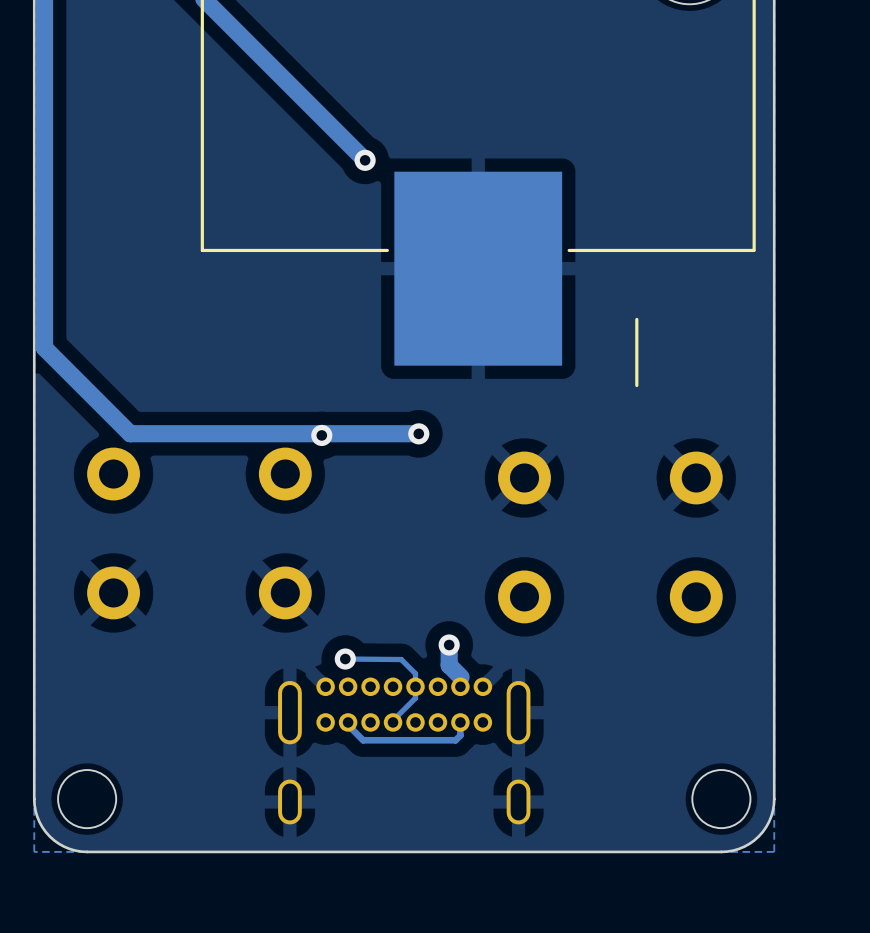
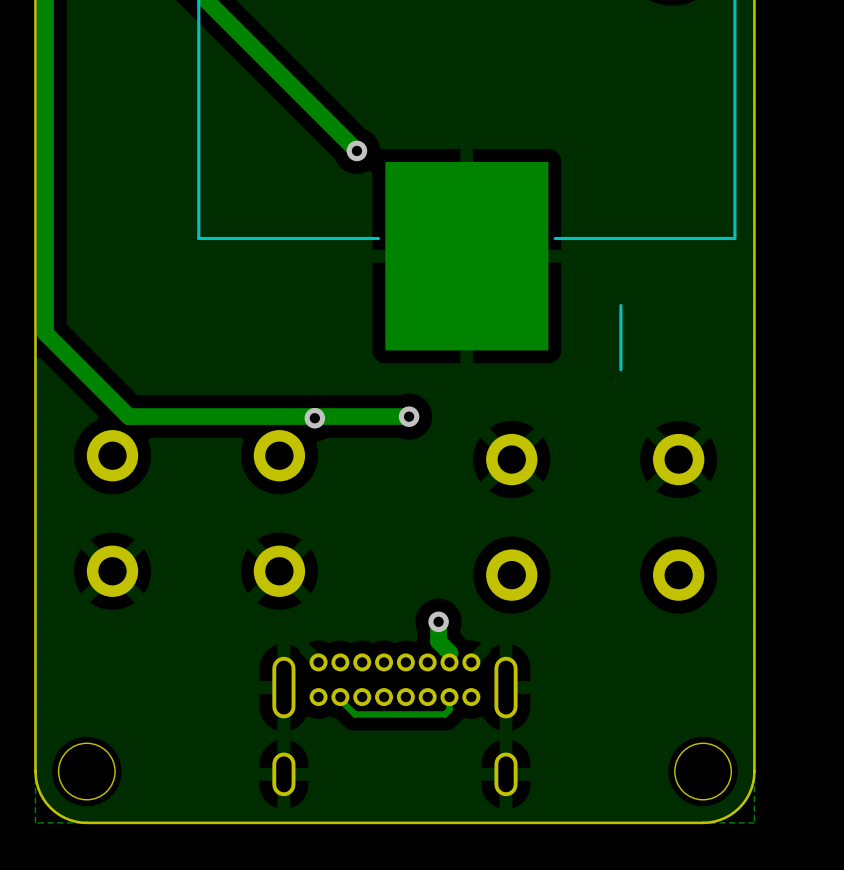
track: (345, 659) (401, 659) (415, 673) (415, 698) (393, 722) -> none
via: (345, 659) -> none

